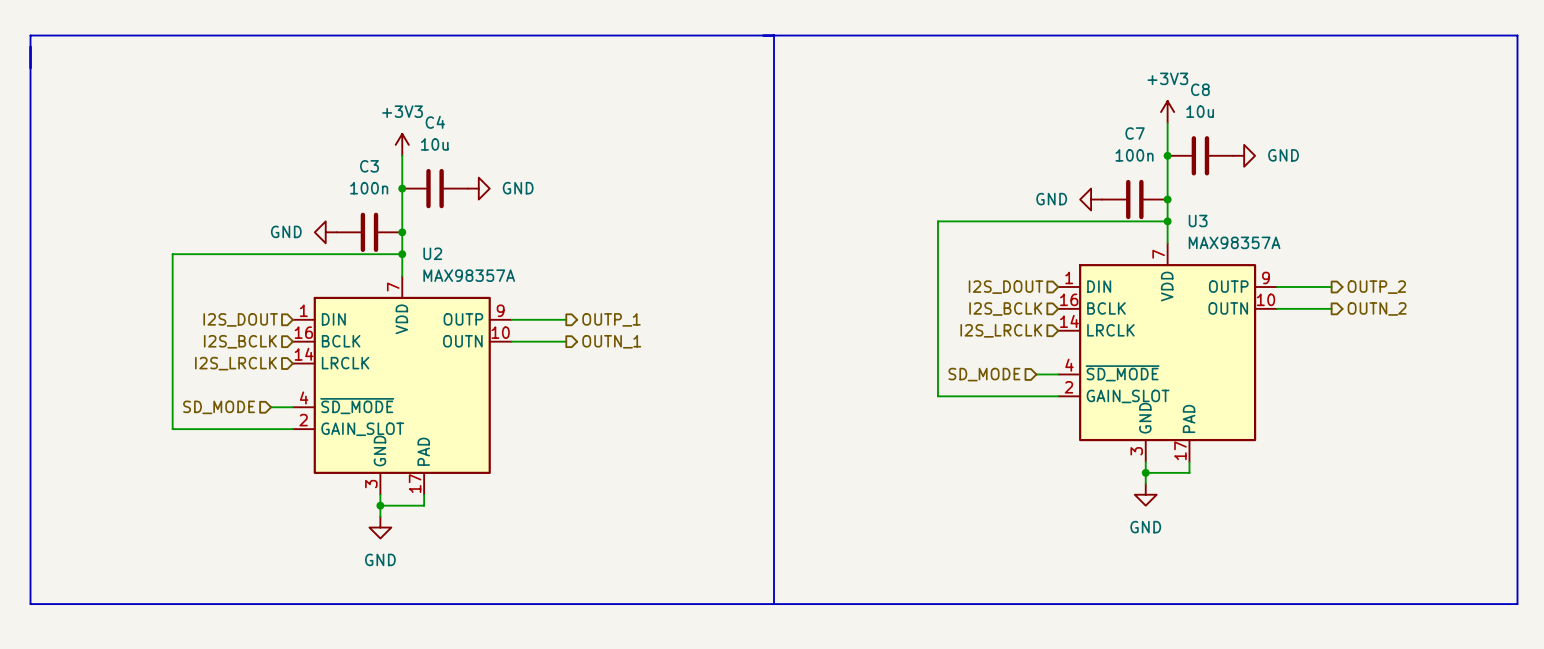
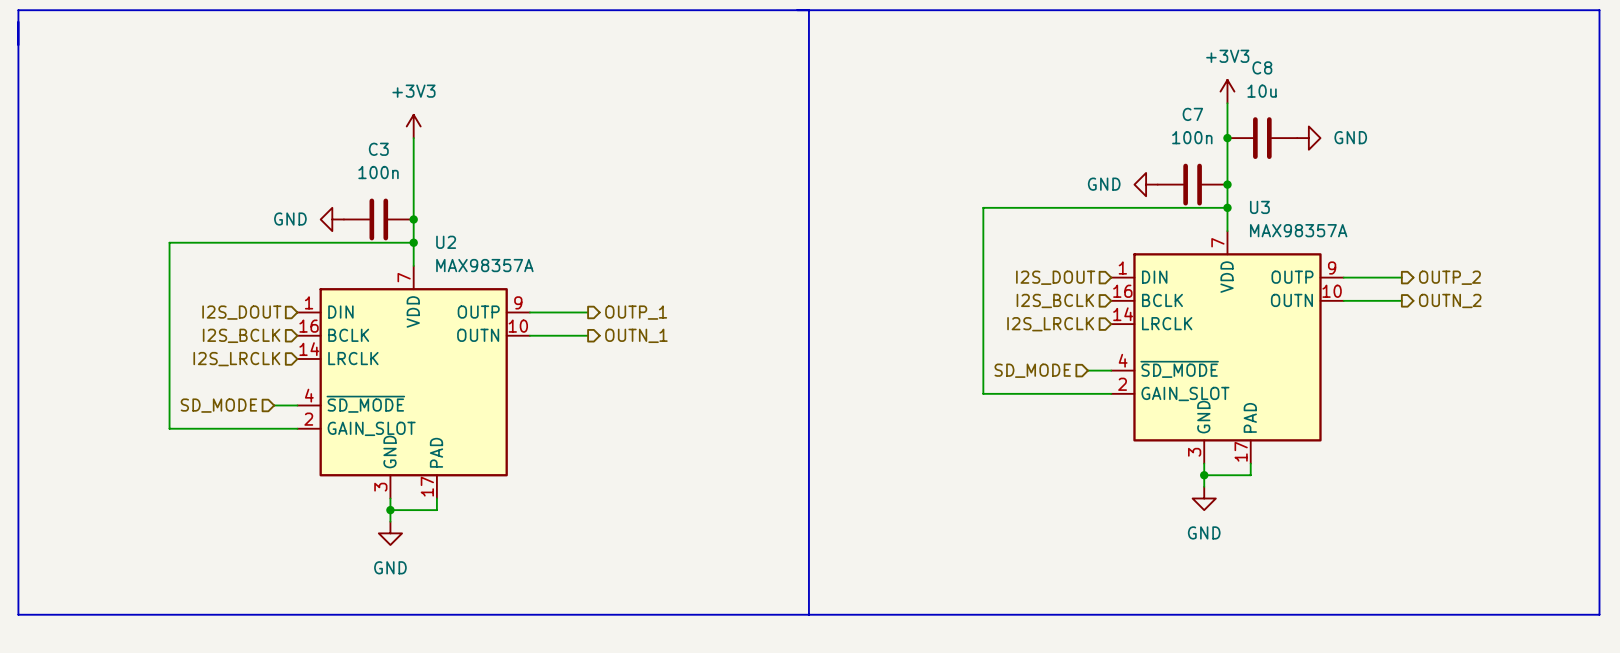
junction: (402, 188) -> none
C4: 10u (435, 188) -> none
power symbol: GND (478, 188) -> none

